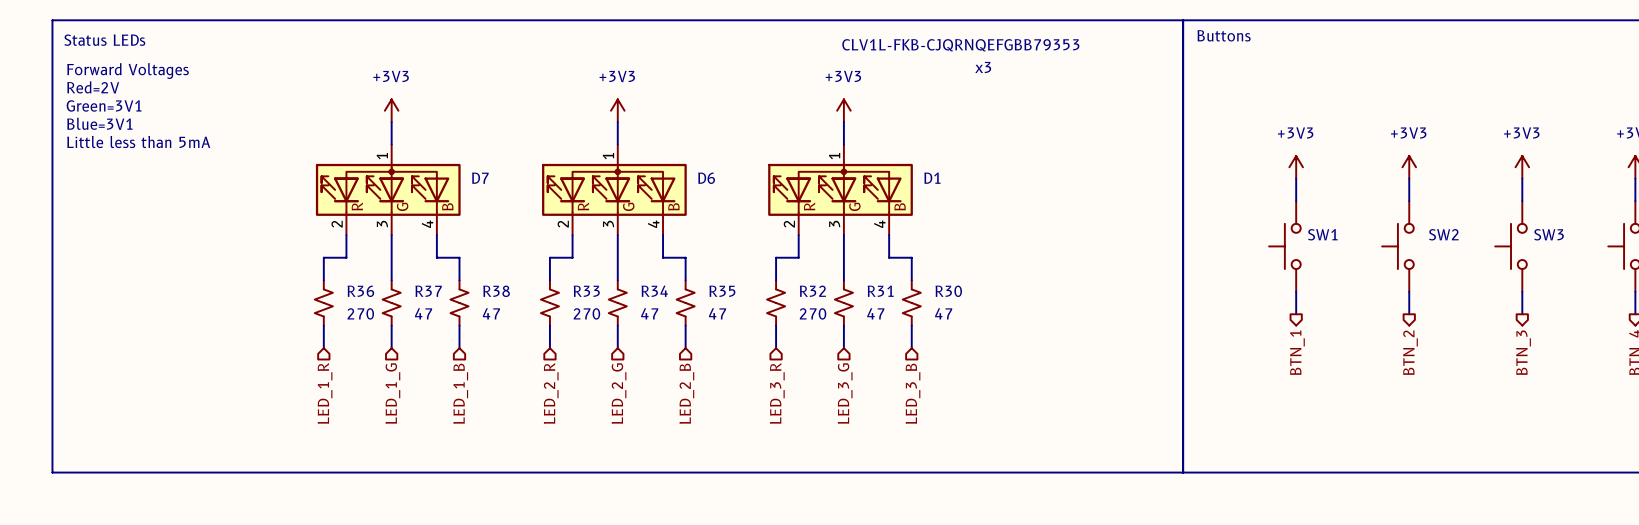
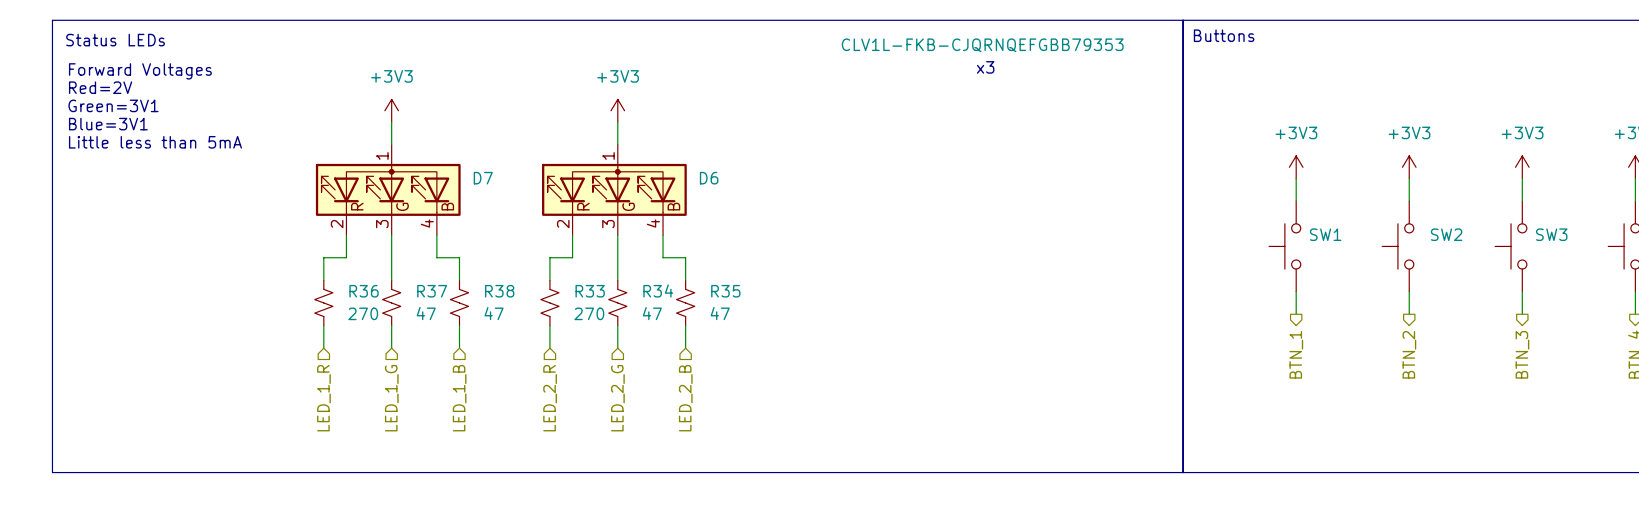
D6 value: none -> CLV1L-FKB-CJQRNQEFGBB79353 (982, 45)
power symbol: +3V3 (843, 110) -> none
wire: (843, 122) (843, 144) -> none
D1: CLV1L-FKB-CJQRNQEFGBB79353 (840, 189) -> none
wire: (798, 235) (798, 257) (776, 257) (776, 280) -> none
wire: (843, 235) (843, 280) -> none
wire: (889, 235) (889, 257) (911, 257) (911, 280) -> none
R32: 270 (776, 302) -> none
R31: 47 (843, 302) -> none
R30: 47 (911, 302) -> none
wire: (776, 325) (776, 348) -> none
wire: (843, 325) (843, 348) -> none
wire: (911, 325) (911, 348) -> none
hierarchical label: LED_3_R (777, 393) -> none
hierarchical label: LED_3_G (845, 393) -> none
hierarchical label: LED_3_B (913, 393) -> none

